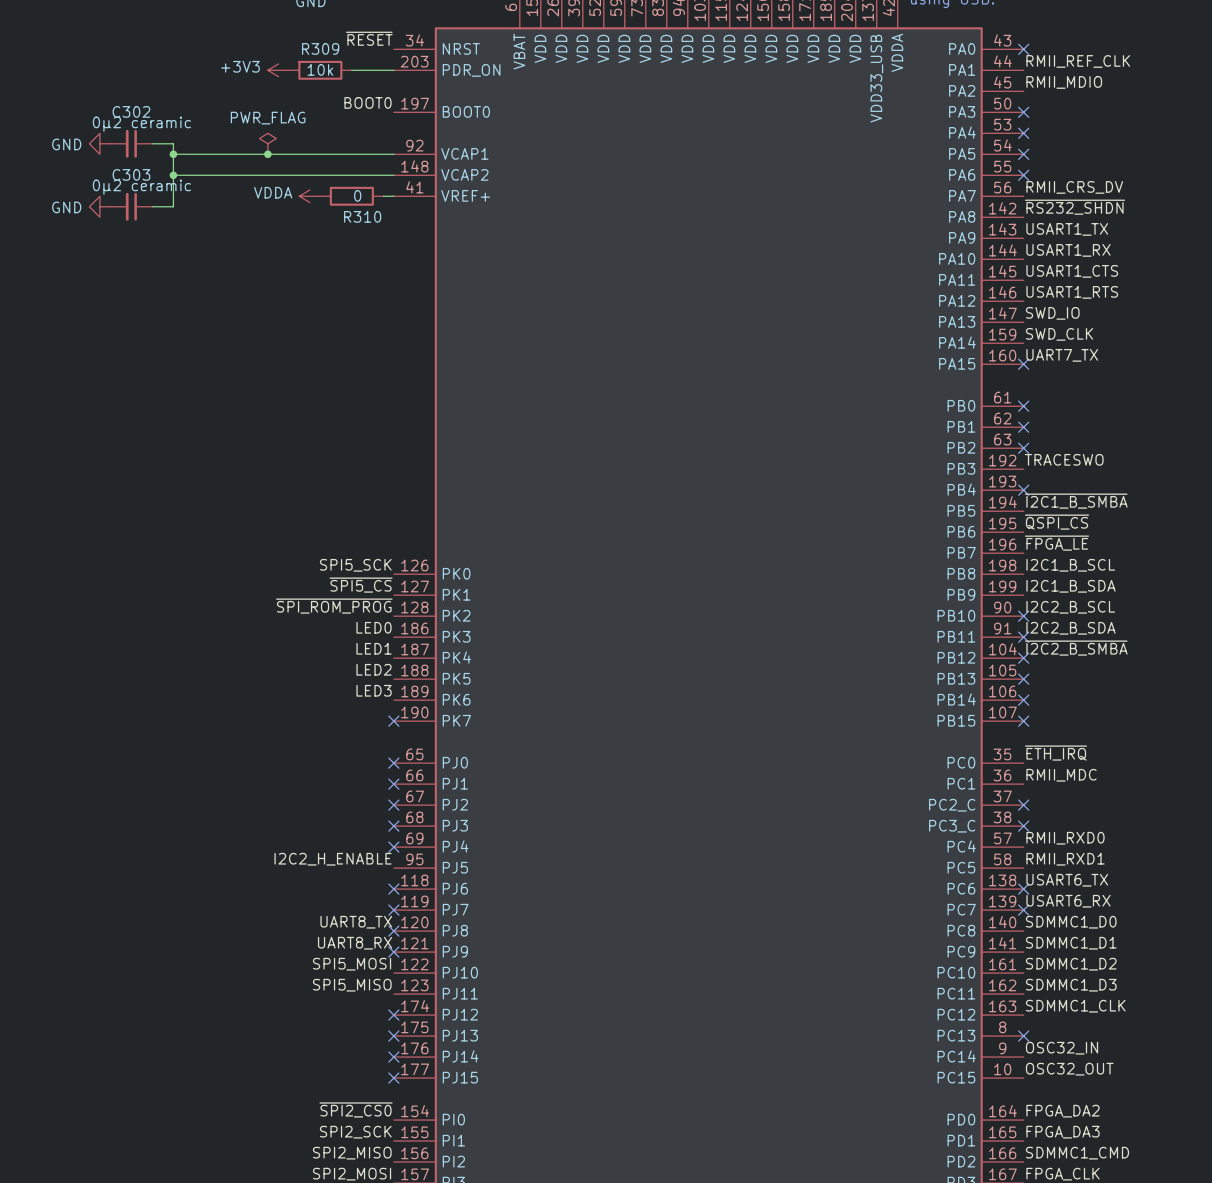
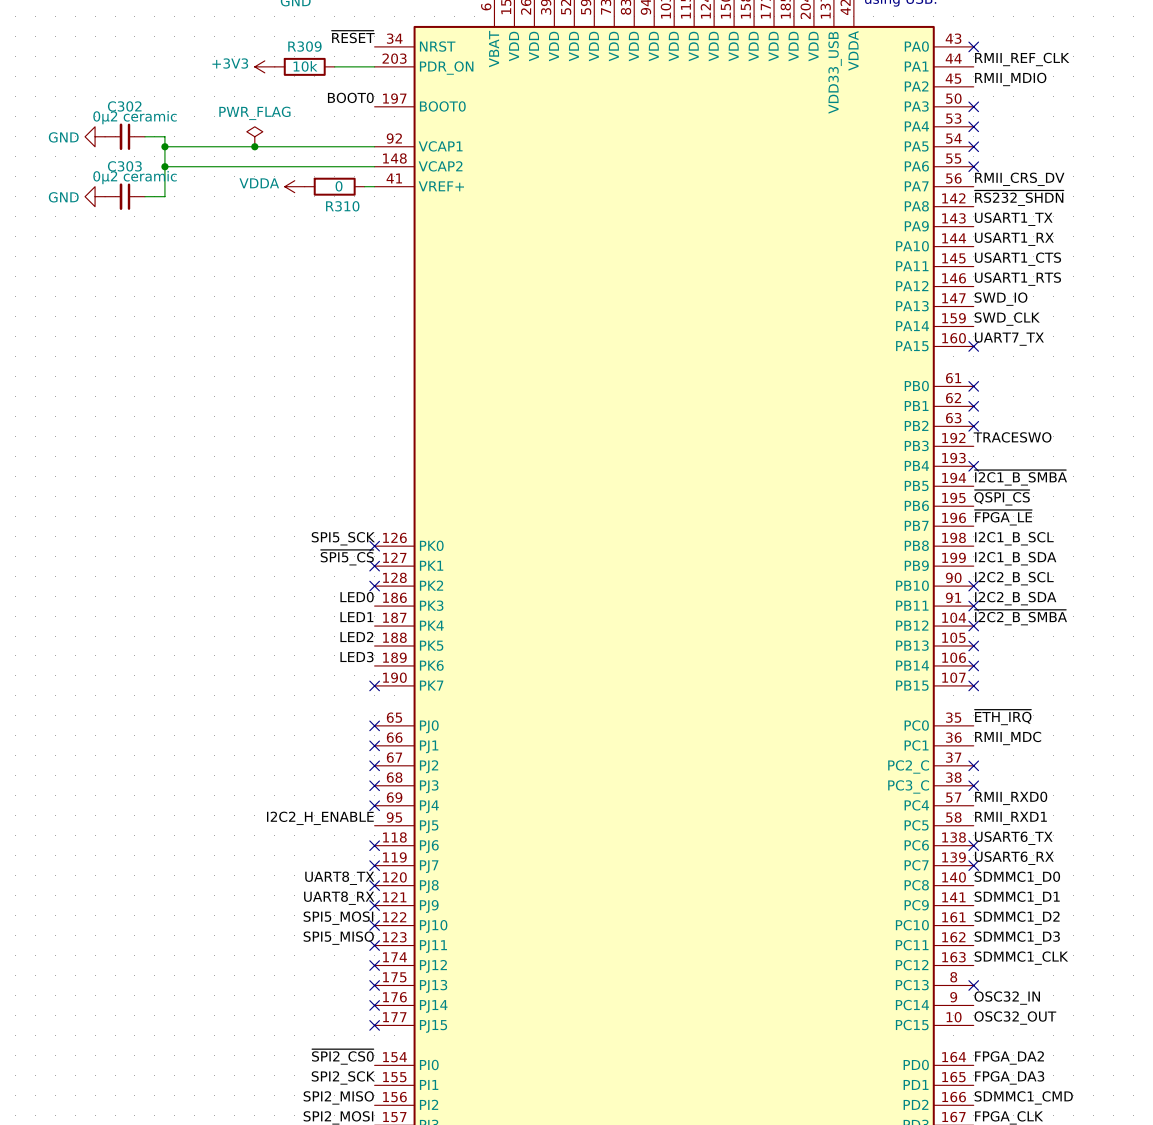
no-connect mark: none -> (374, 546)
no-connect mark: none -> (374, 566)
label: ~{SPI_ROM_PROG} (334, 606) -> none
no-connect mark: none -> (374, 586)
no-connect mark: none -> (374, 925)
no-connect mark: none -> (374, 945)

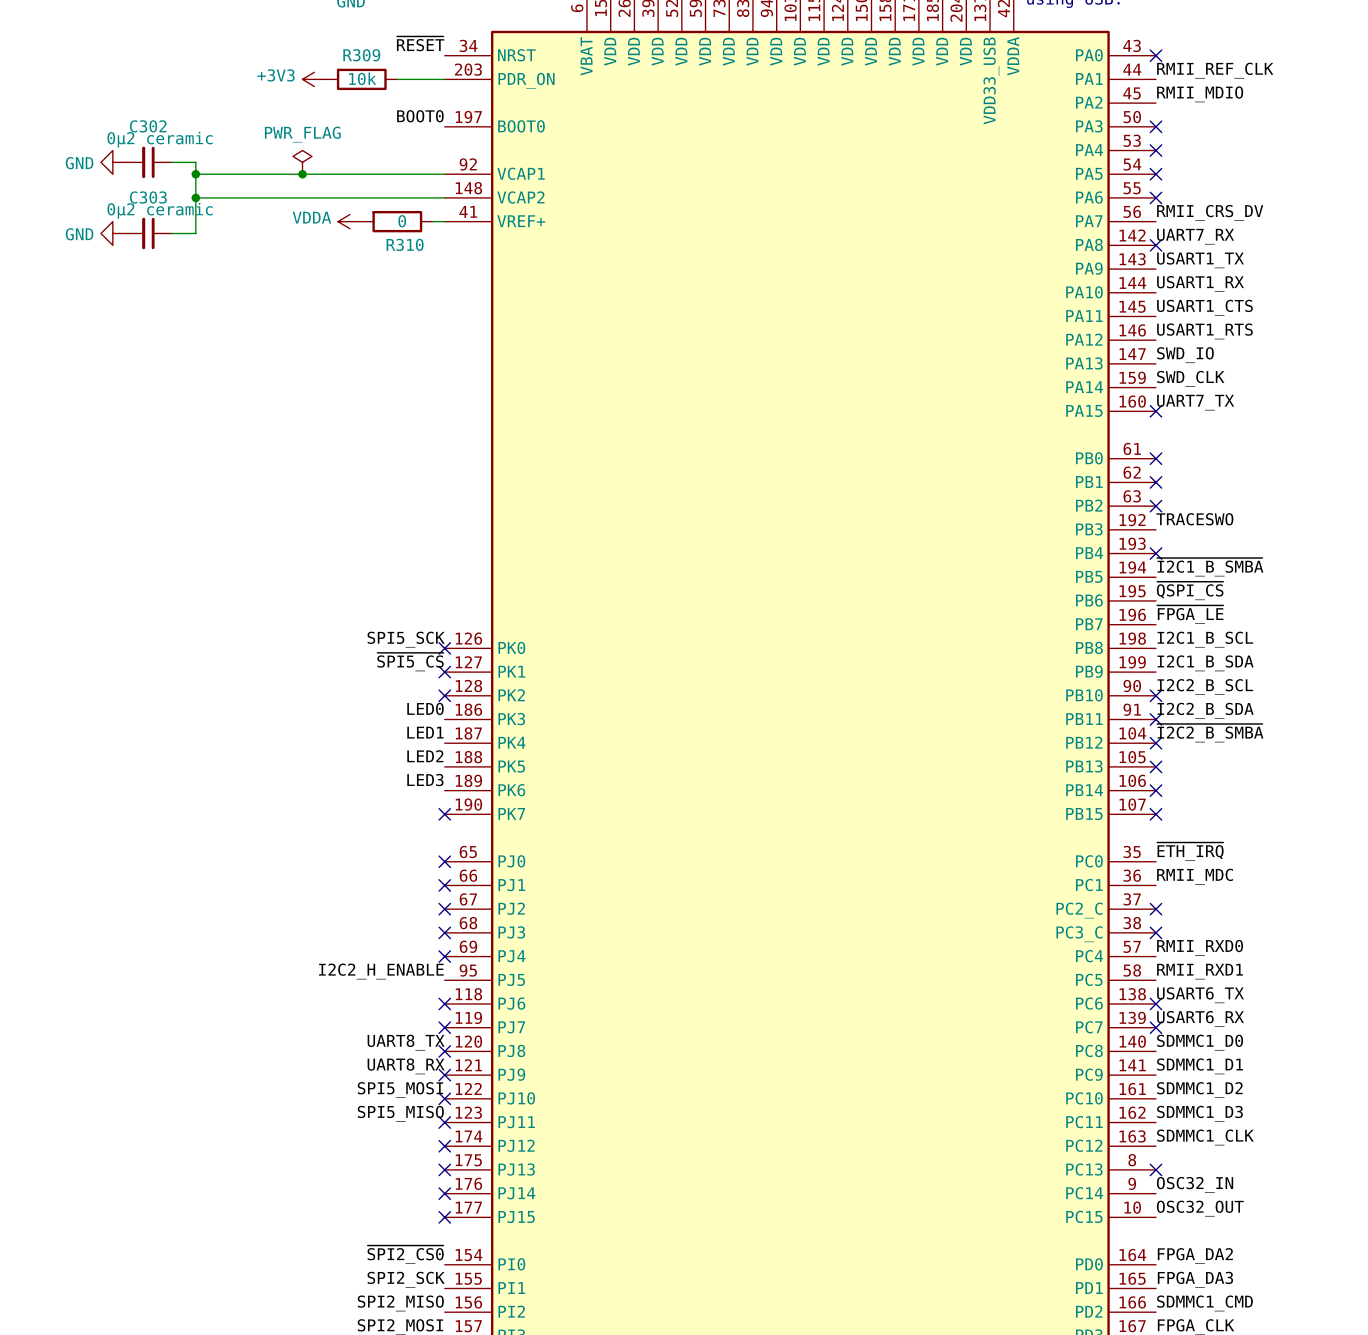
label: ~{RS232_SHDN} (1019, 198) -> UART7_RX (1195, 236)
no-connect mark: none -> (1155, 245)

